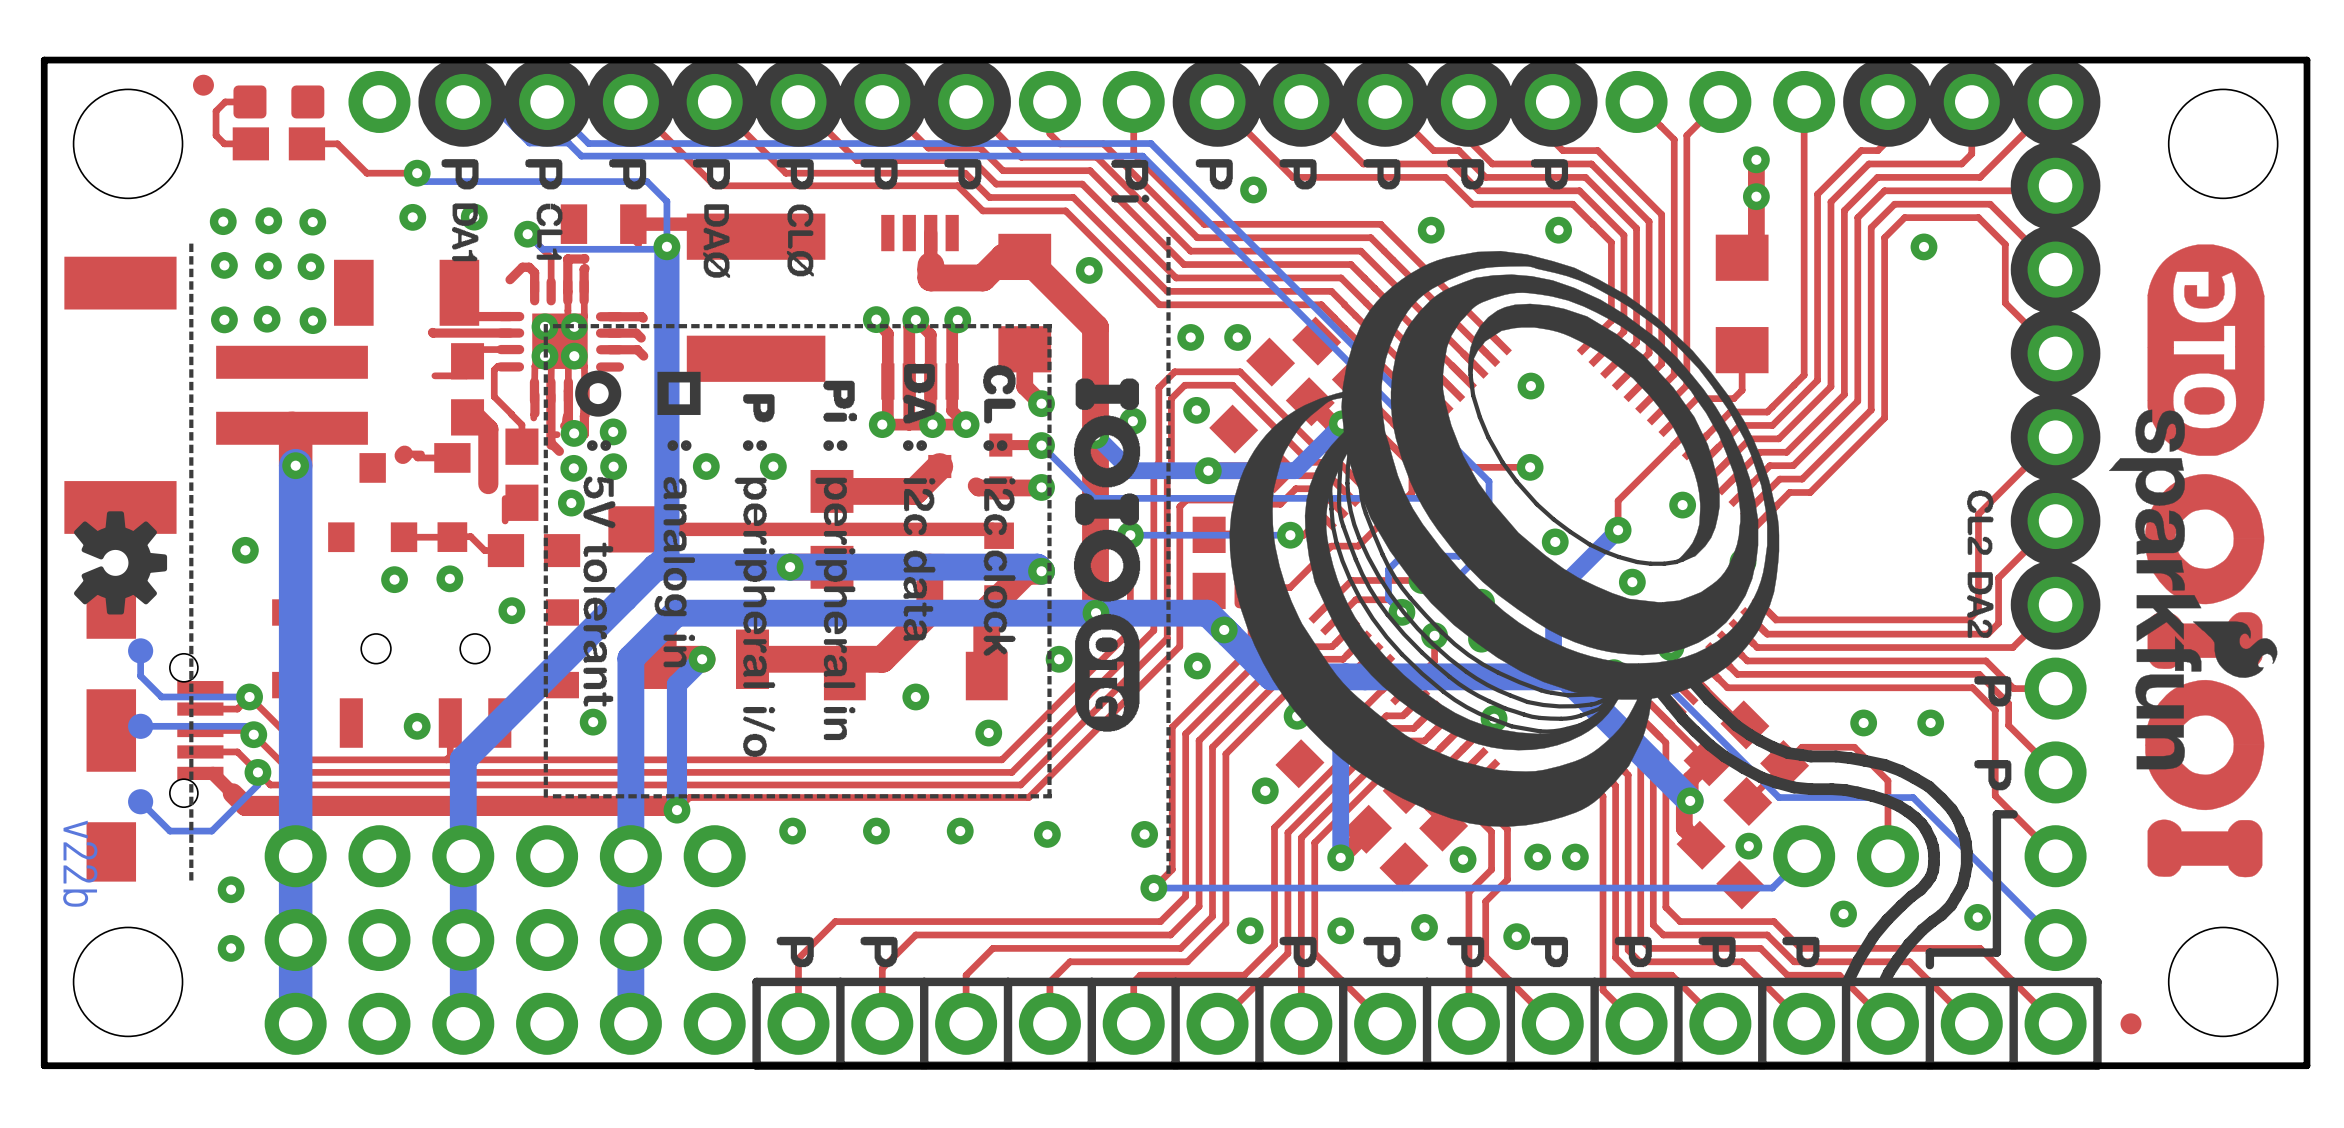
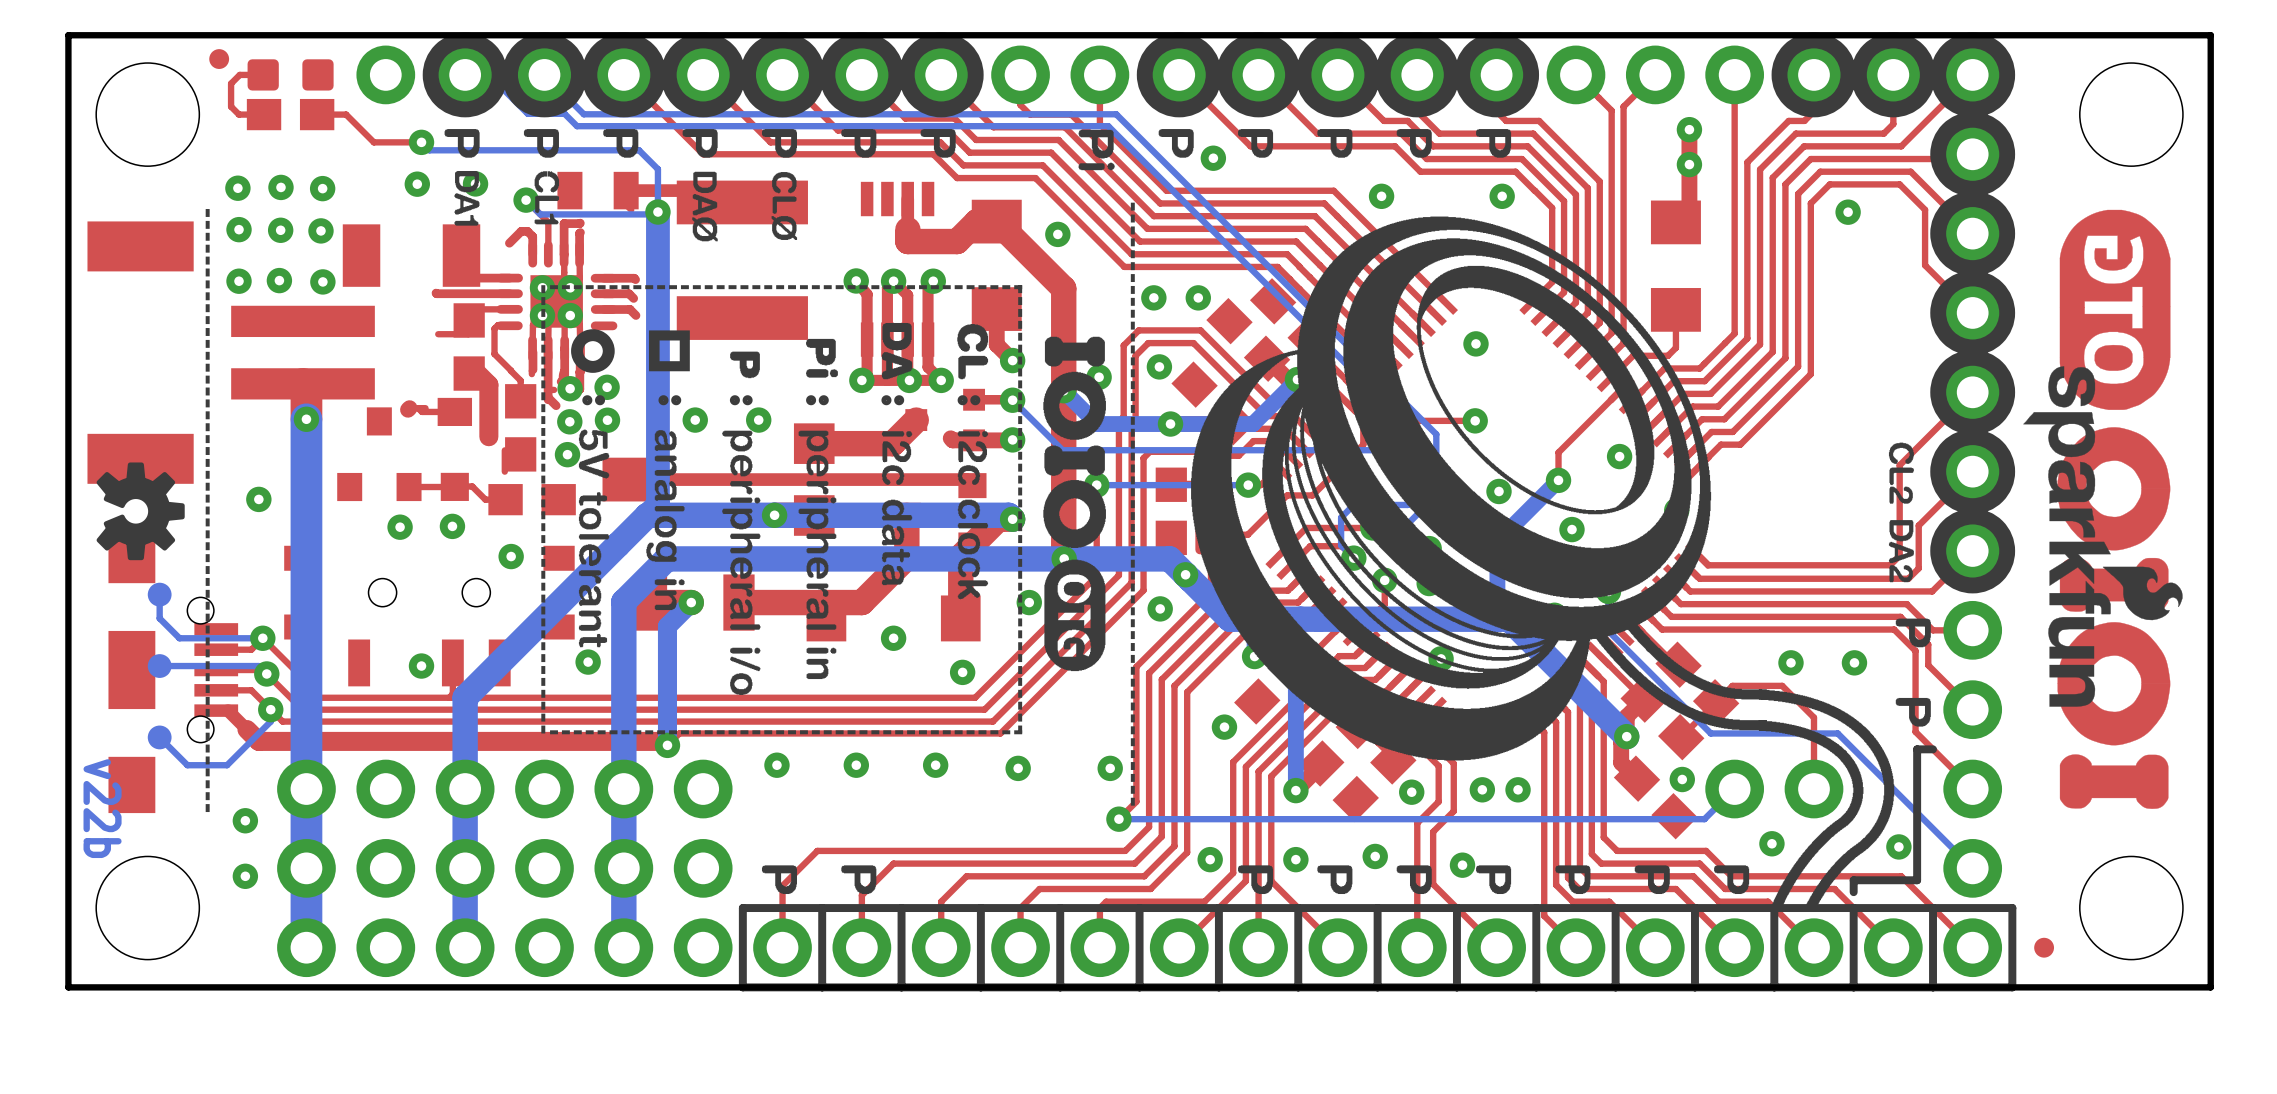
drawing: [1229, 250, 1780, 827] -> none
drawing: none -> [1191, 216, 1895, 911]
line: (1471, 359) (1470, 375) (1473, 395) (1488, 437) (1502, 462) (1516, 481) (1553, 519) (1589, 544) (1618, 557) (1637, 562) (1664, 563) (1675, 562) (1691, 555) -> none
line: (1349, 451) (1347, 467) (1348, 497) (1359, 537) (1390, 594) (1432, 644) (1476, 678) (1498, 690) (1527, 702) (1543, 704) (1575, 706) (1593, 704) (1608, 697) -> none
line: (1340, 462) (1340, 513) (1362, 574) (1387, 614) (1404, 634) (1435, 664) (1458, 683) (1478, 696) (1505, 708) (1532, 716) (1561, 718) (1576, 716) (1599, 708) (1610, 698) -> none
line: (1333, 473) (1330, 491) (1332, 526) (1336, 542) (1349, 578) (1360, 599) (1386, 637) (1422, 673) (1443, 691) (1466, 707) (1511, 726) (1540, 731) (1553, 731) (1579, 725) (1591, 719) -> none
line: (1360, 483) (1365, 513) (1382, 554) (1394, 577) (1410, 598) (1454, 644) (1498, 672) (1541, 690) (1567, 695) (1590, 694) -> none
line: (1694, 683) (1736, 725) (1773, 747) (1788, 753) (1810, 756) (1850, 758) (1884, 764) (1900, 770) (1929, 786) (1951, 809) (1958, 820) (1965, 842) (1966, 865) (1962, 885) (1950, 905) (1908, 944) (1885, 979) -> none
line: (1662, 694) (1682, 718) (1709, 744) (1724, 756) (1761, 777) (1794, 787) (1845, 790) (1885, 800) (1908, 811) (1925, 829) (1933, 847) (1934, 854) (1933, 870) (1930, 877) (1920, 889) (1901, 905) (1873, 935) (1848, 980) -> none

